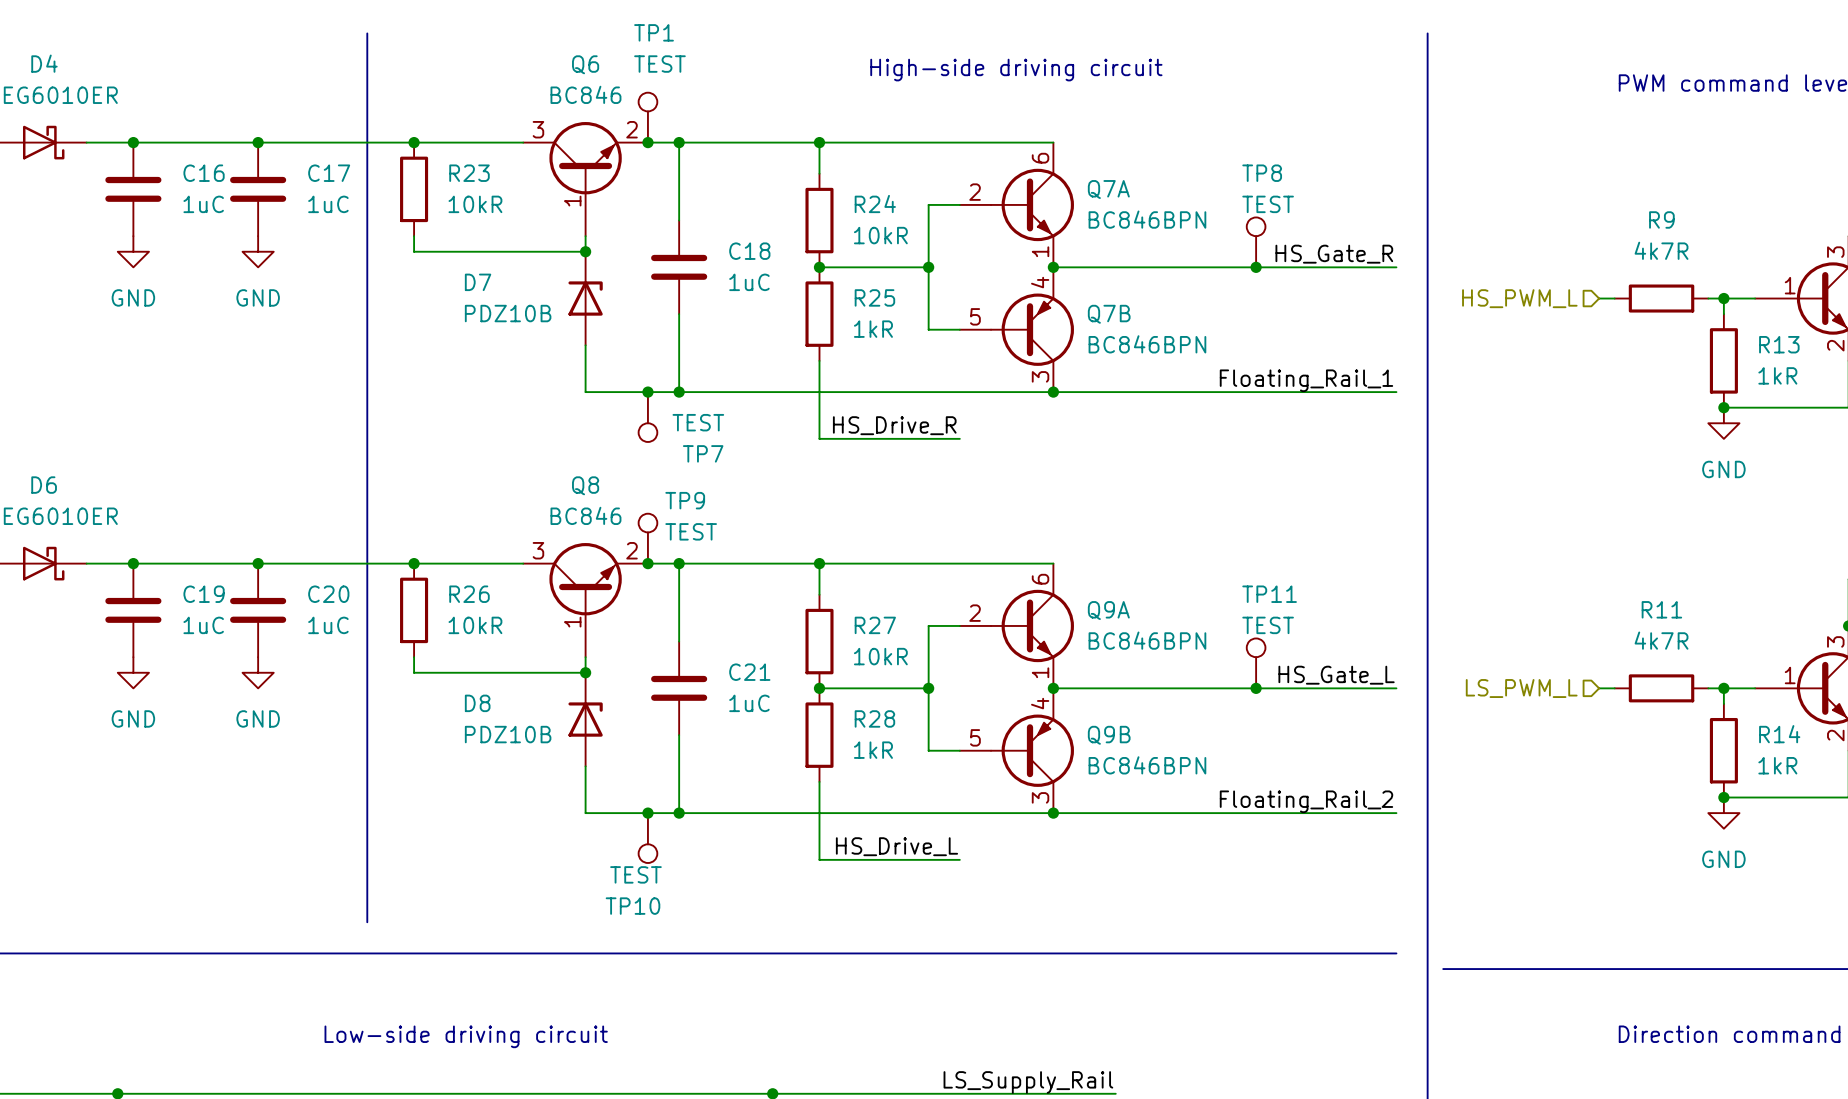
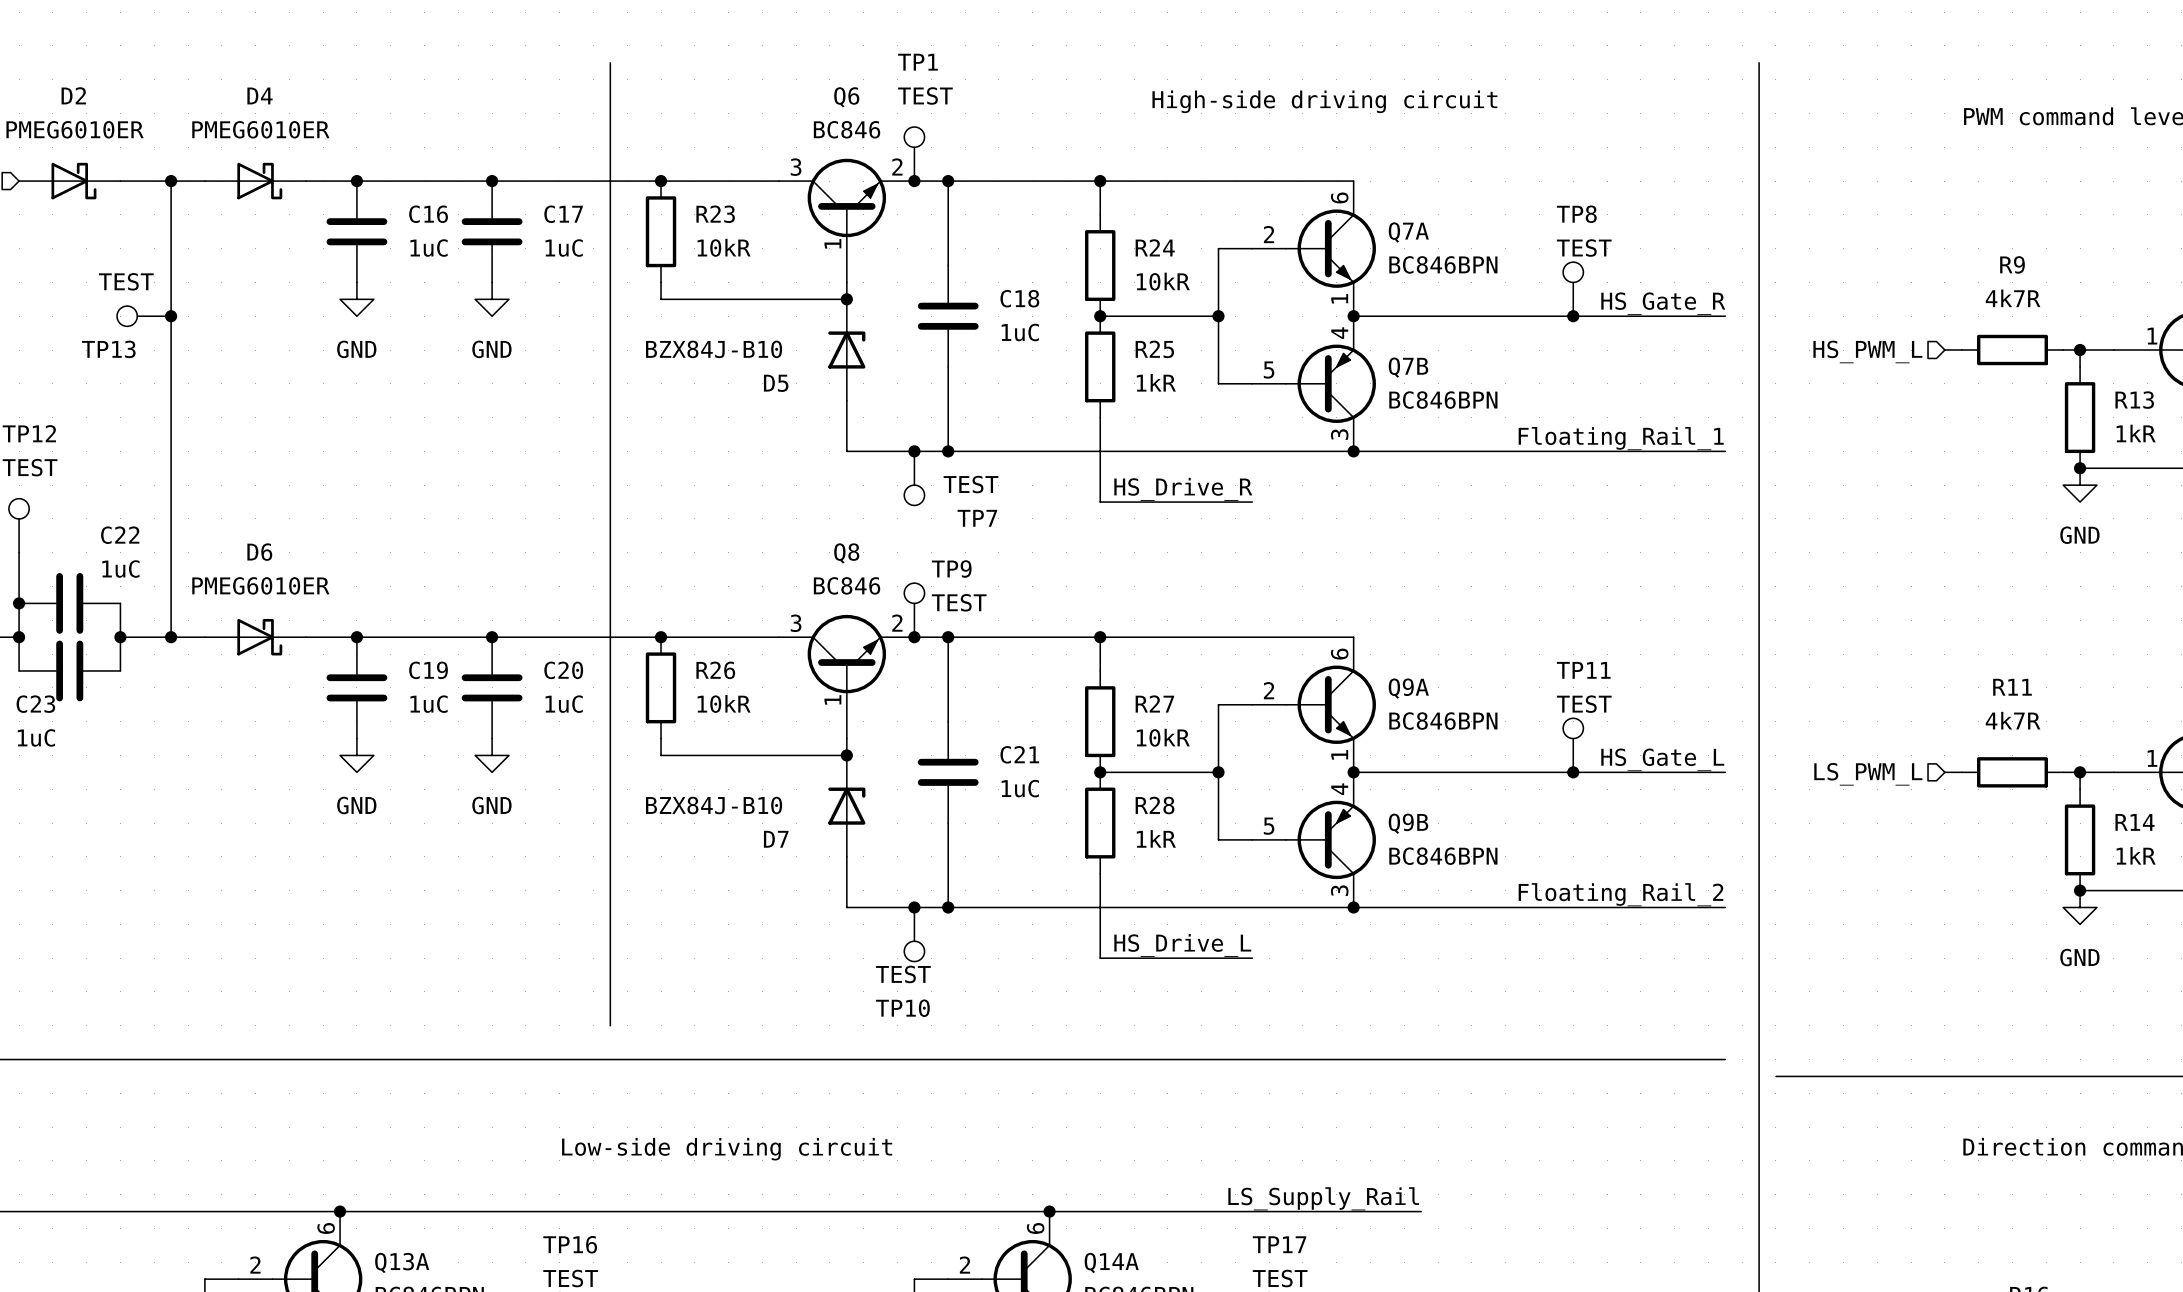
D7 name: D7 (478, 282) -> D5 (776, 383)
D7 value: PDZ10B (508, 313) -> BZX84J-B10 (714, 349)
D8 name: D8 (477, 703) -> D7 (776, 839)
D8 value: PDZ10B (508, 734) -> BZX84J-B10 (714, 805)

